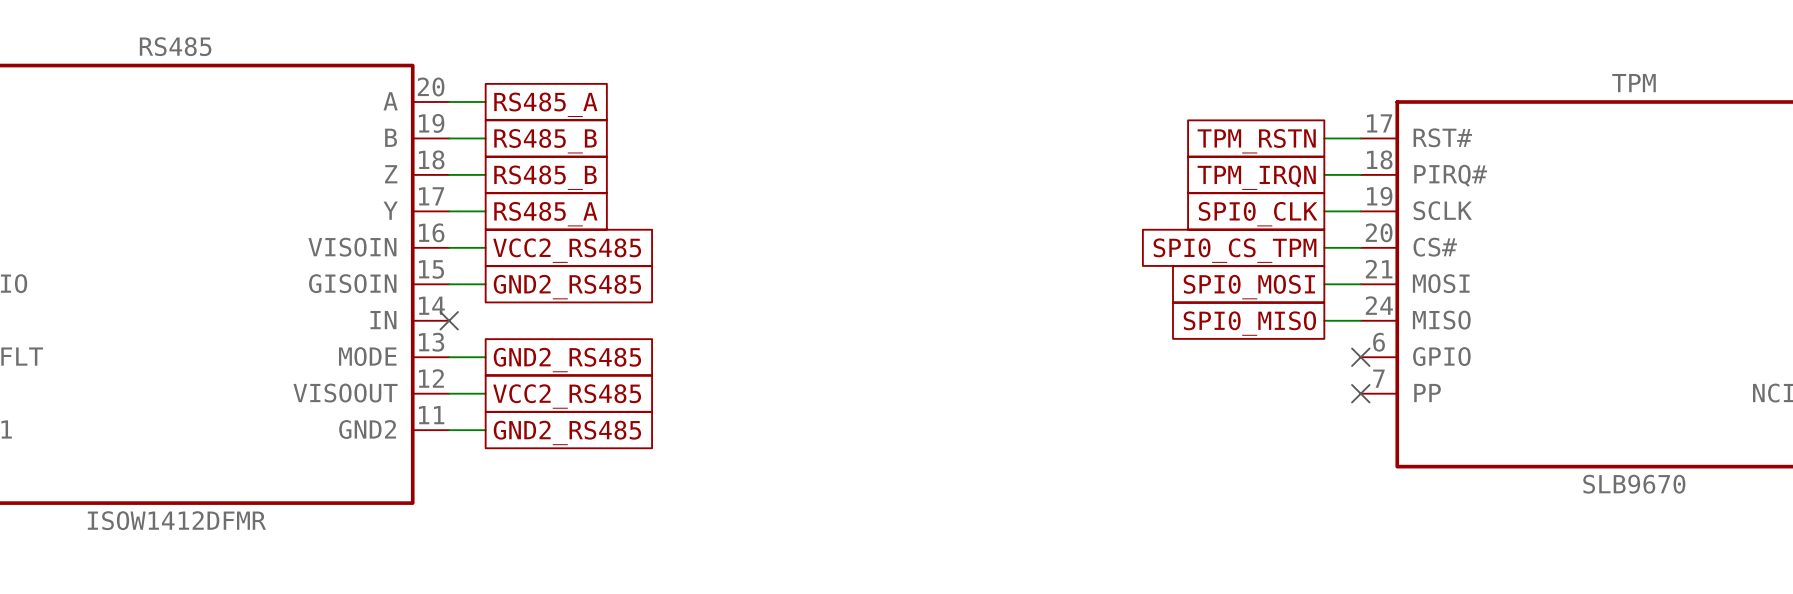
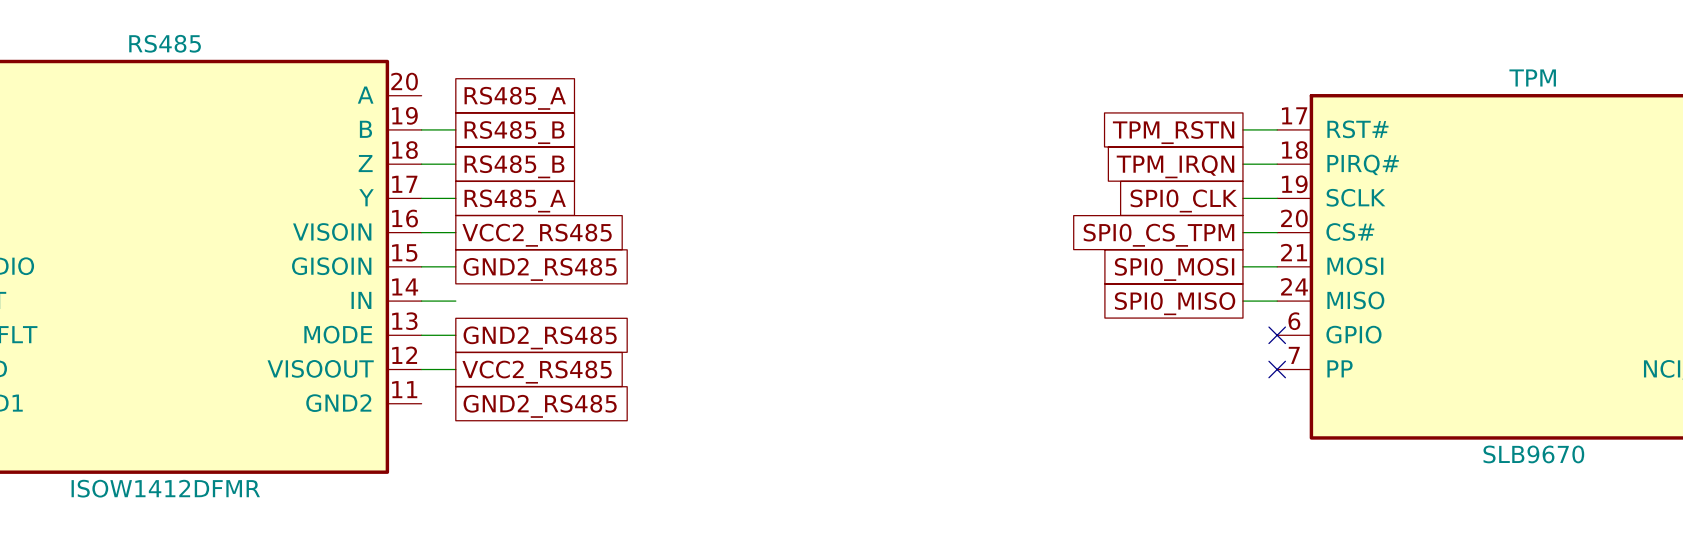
wire: (449, 101) (485, 101) -> none
no-connect mark: (449, 320) -> none
wire: (449, 430) (485, 430) -> (421, 301) (455, 301)

